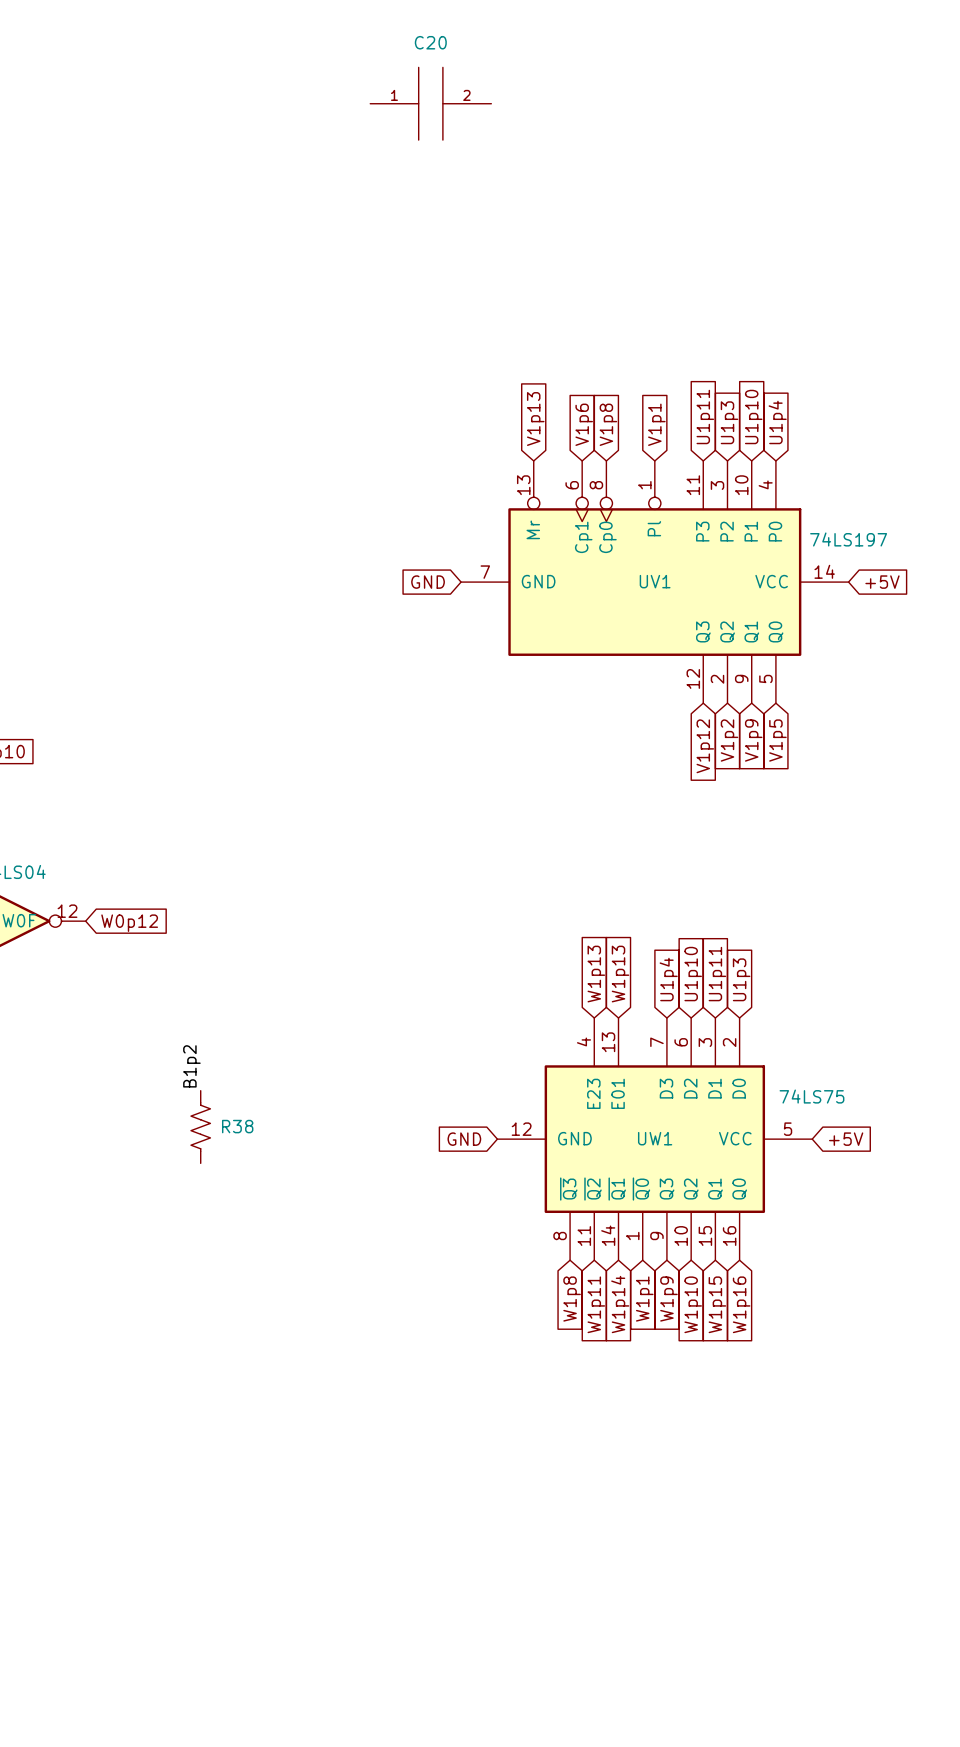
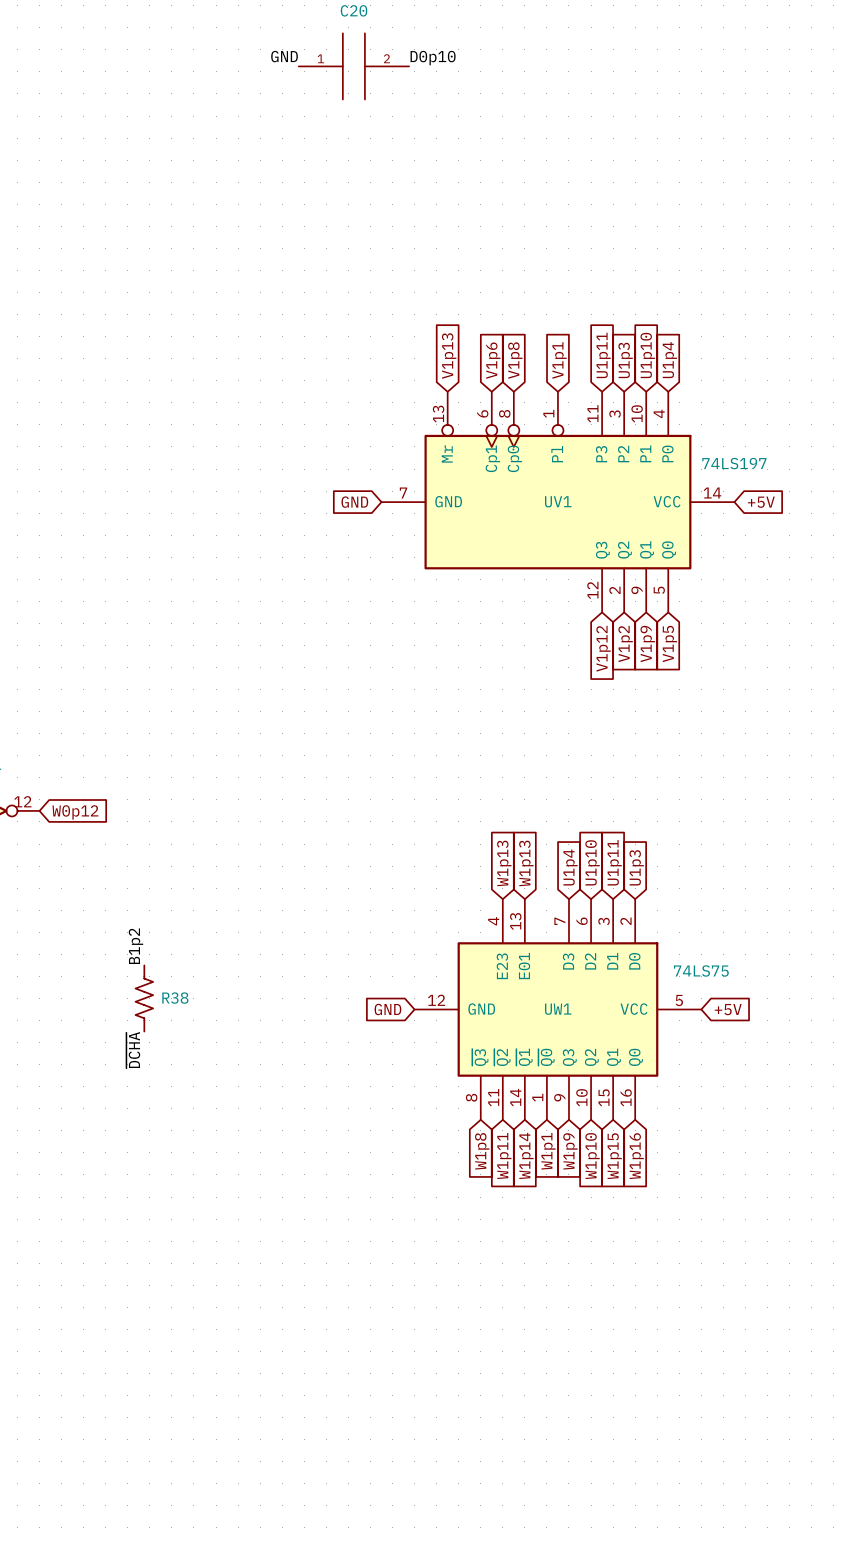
label: none -> GND (284, 56)
label: none -> D0p10 (433, 58)
label: none -> ~{DCHA} (133, 1050)

